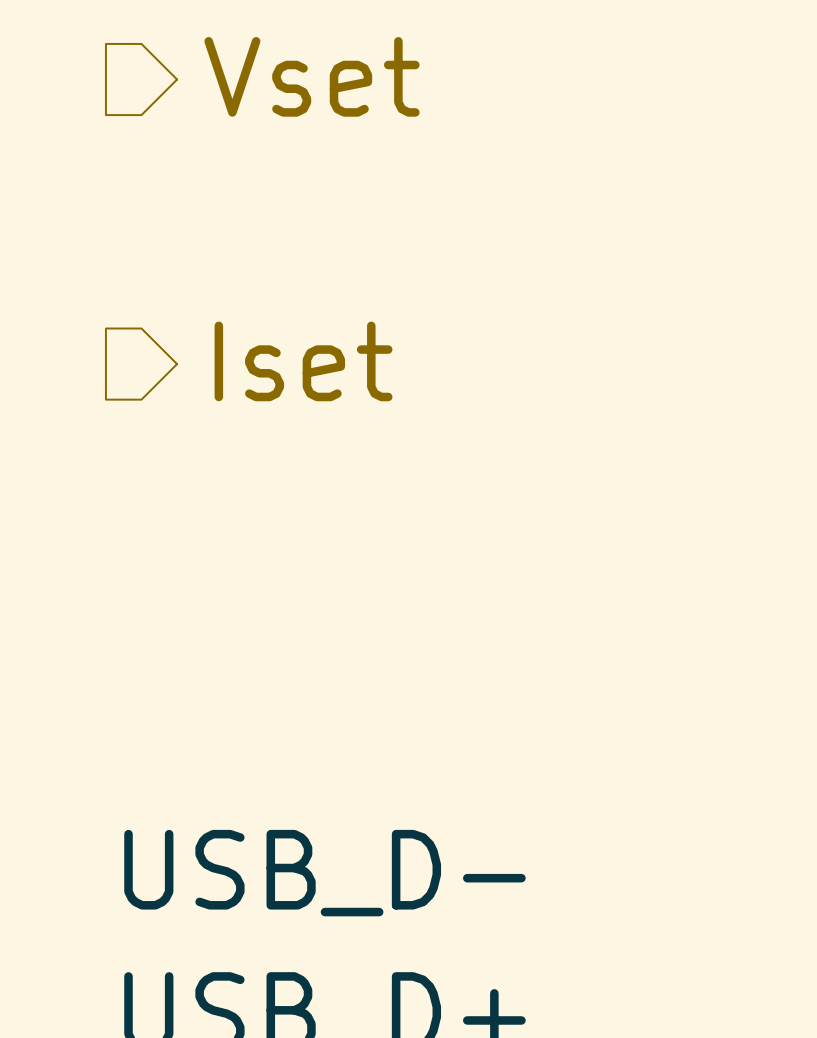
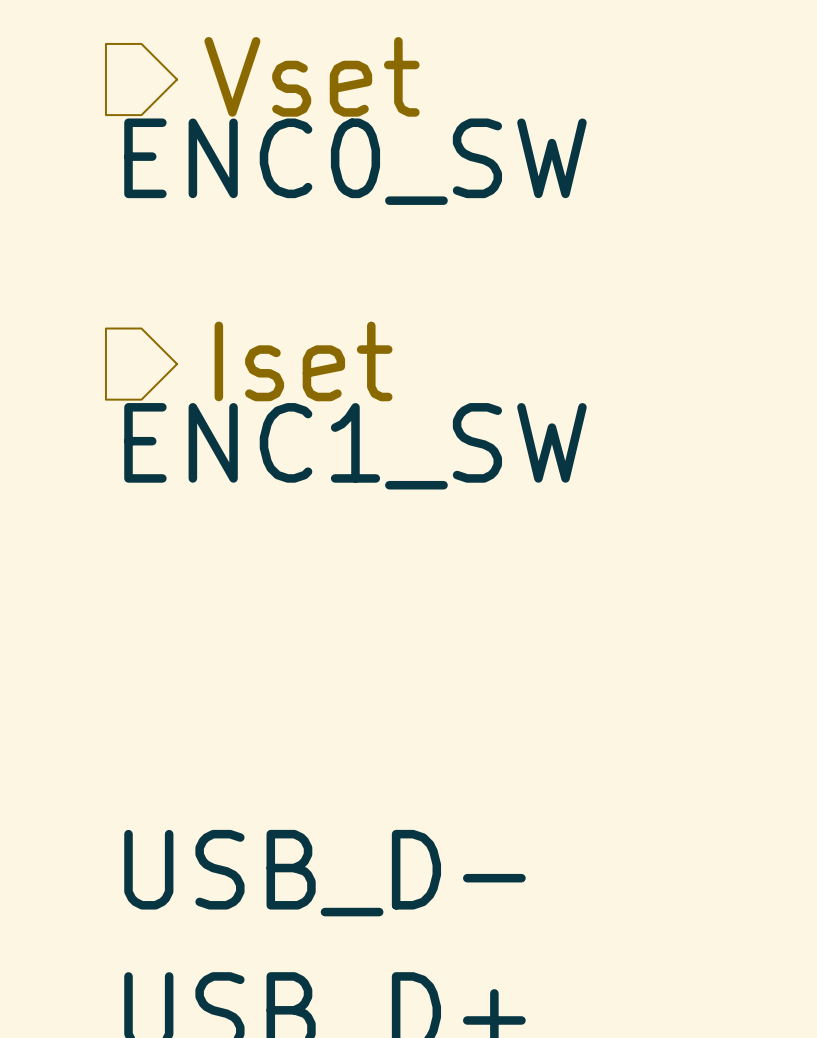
label: none -> ENC0_SW (355, 161)
label: none -> ENC1_SW (355, 446)

